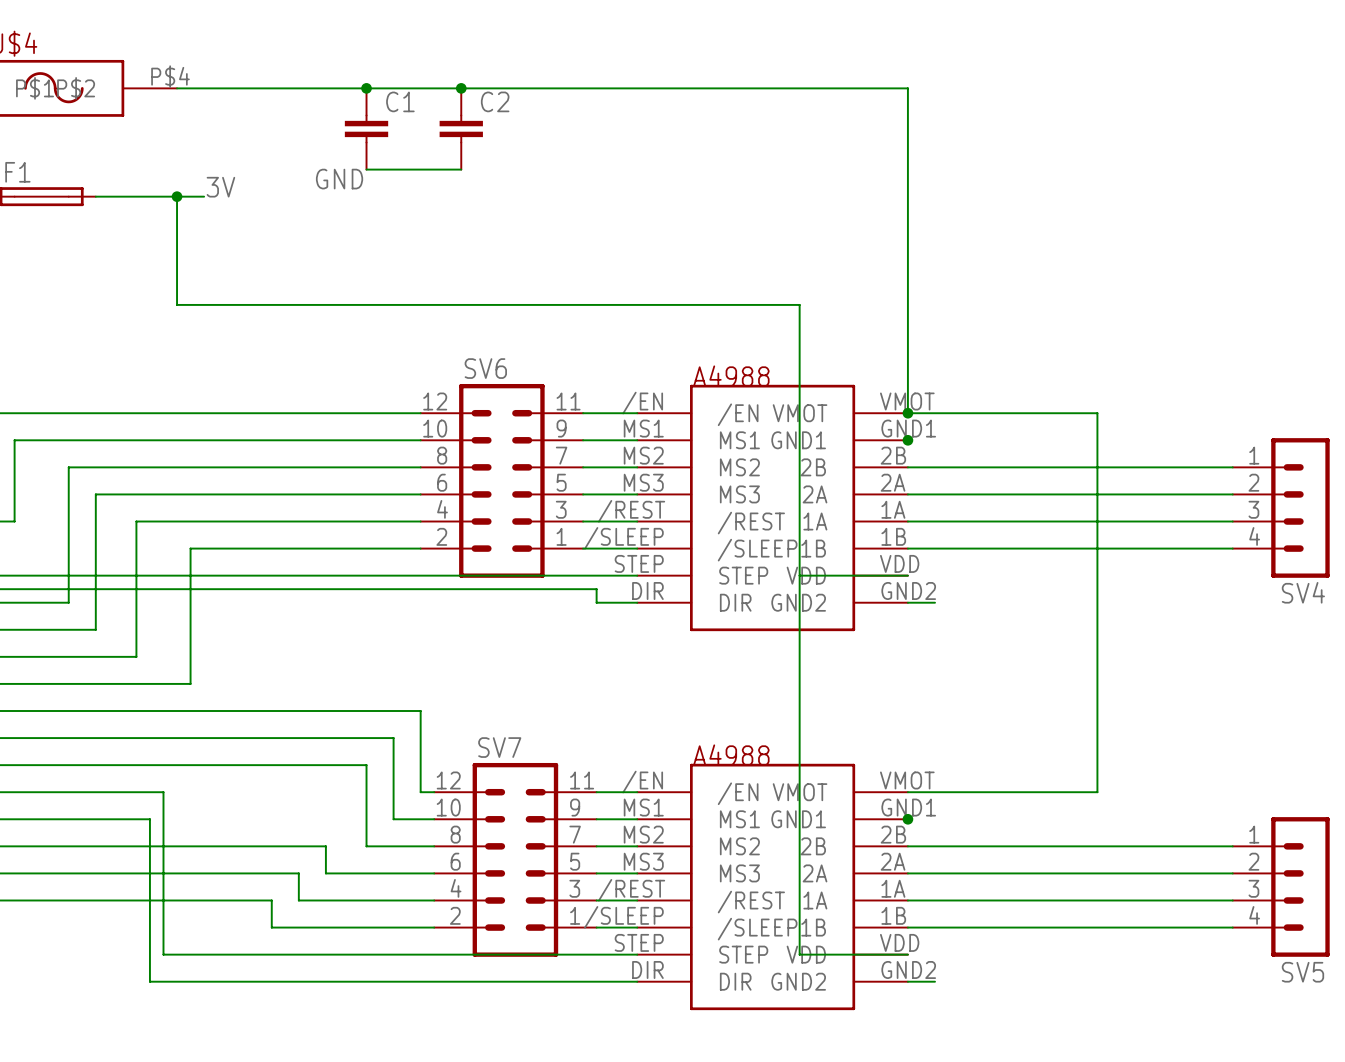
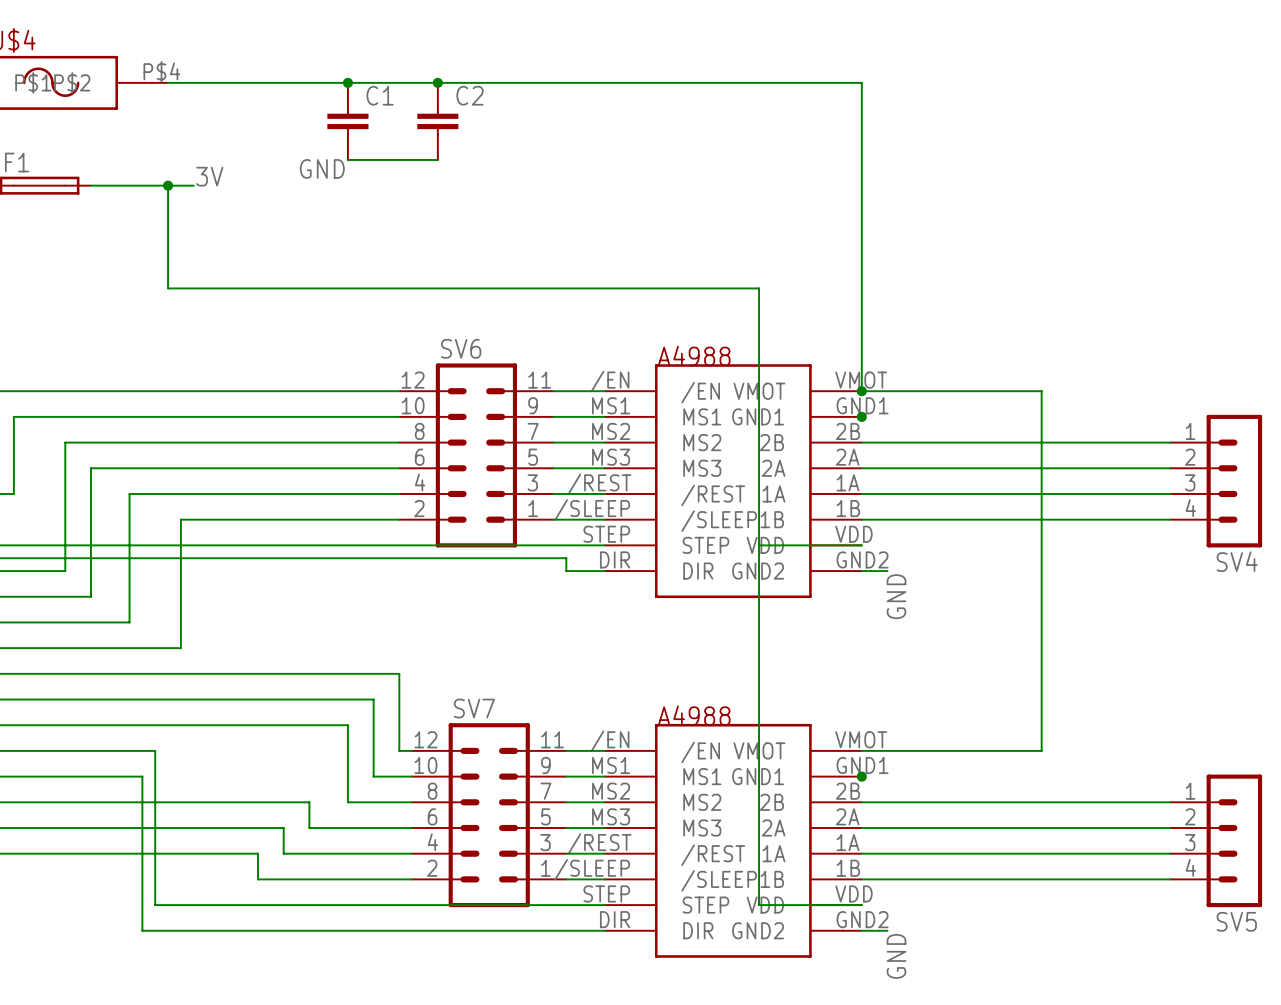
label: none -> GND (896, 596)
label: none -> GND (896, 956)

